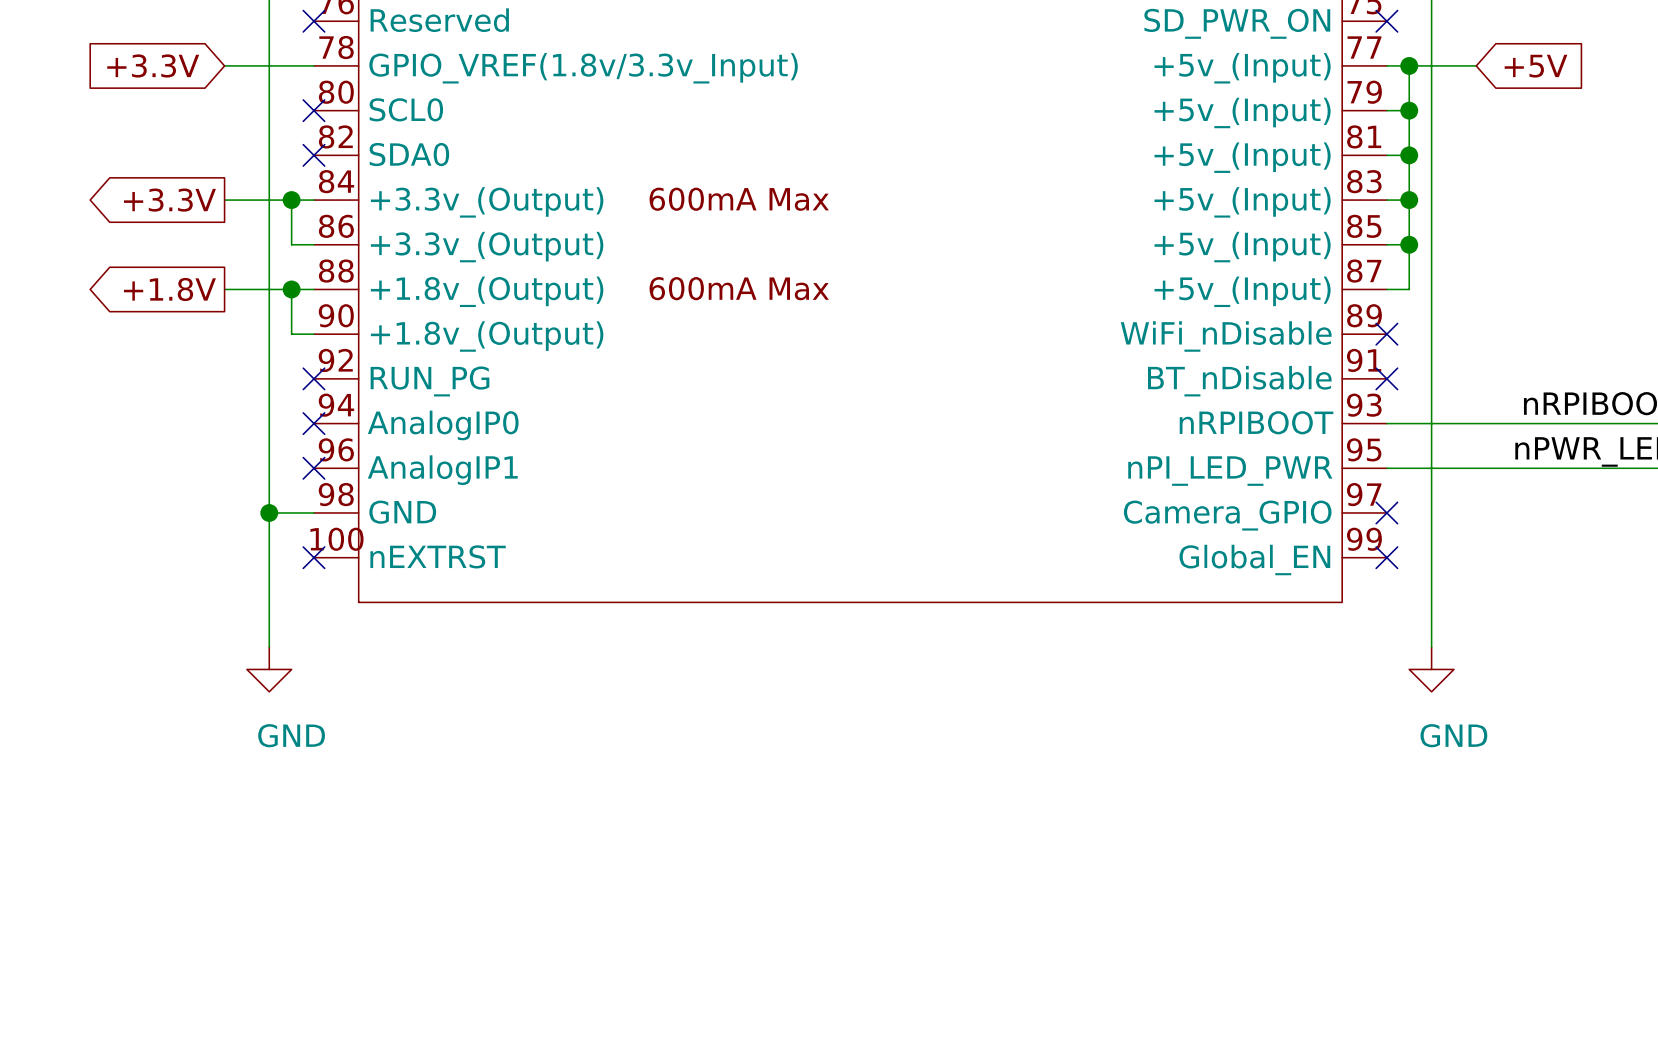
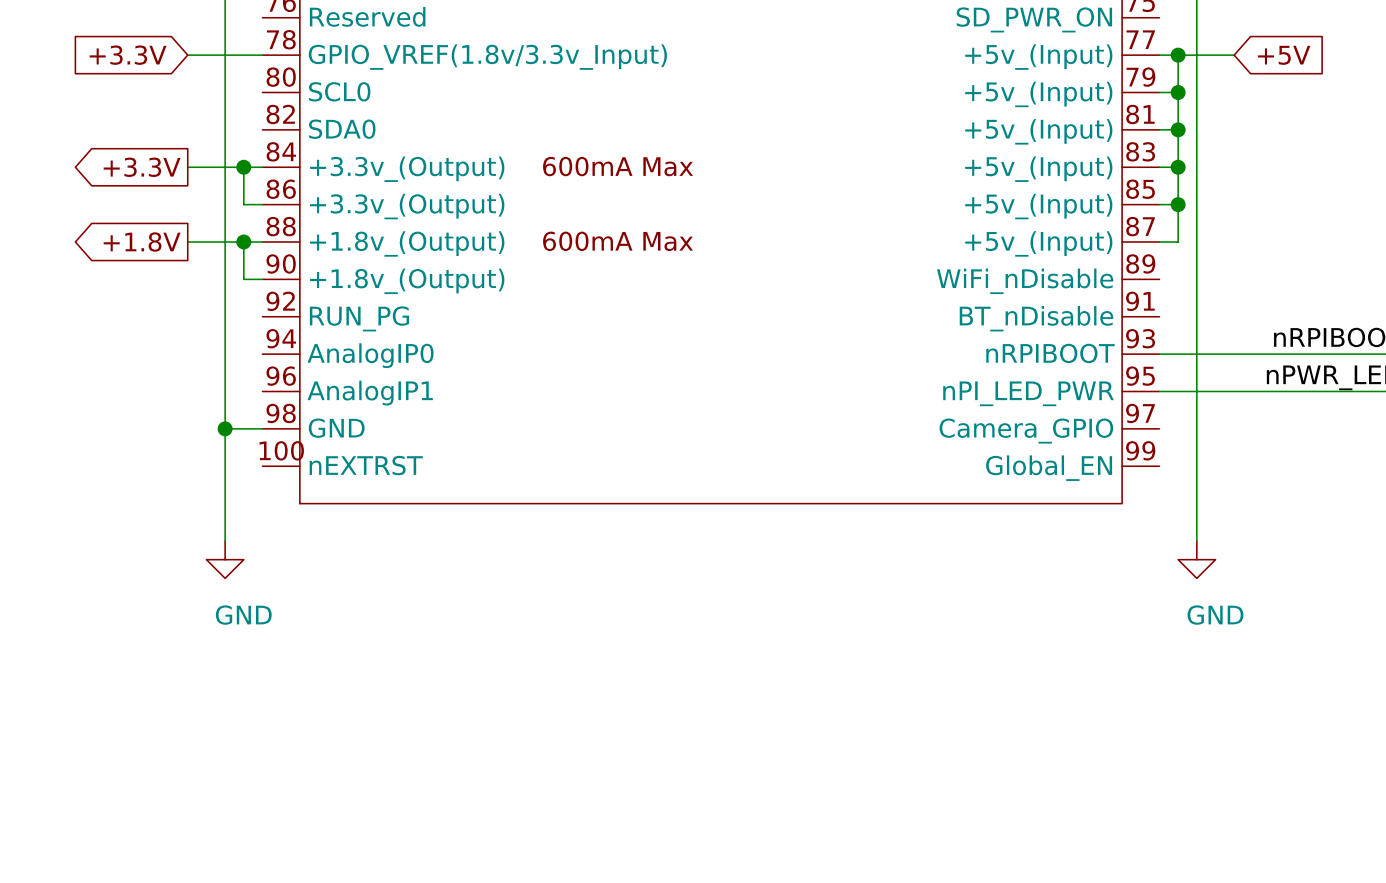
no-connect mark: (313, 21) -> none
no-connect mark: (1386, 21) -> none
no-connect mark: (313, 110) -> none
no-connect mark: (313, 155) -> none
no-connect mark: (1386, 334) -> none
no-connect mark: (313, 378) -> none
no-connect mark: (1386, 378) -> none
no-connect mark: (313, 423) -> none
no-connect mark: (313, 468) -> none
no-connect mark: (1386, 512) -> none
no-connect mark: (313, 557) -> none
no-connect mark: (1386, 557) -> none

